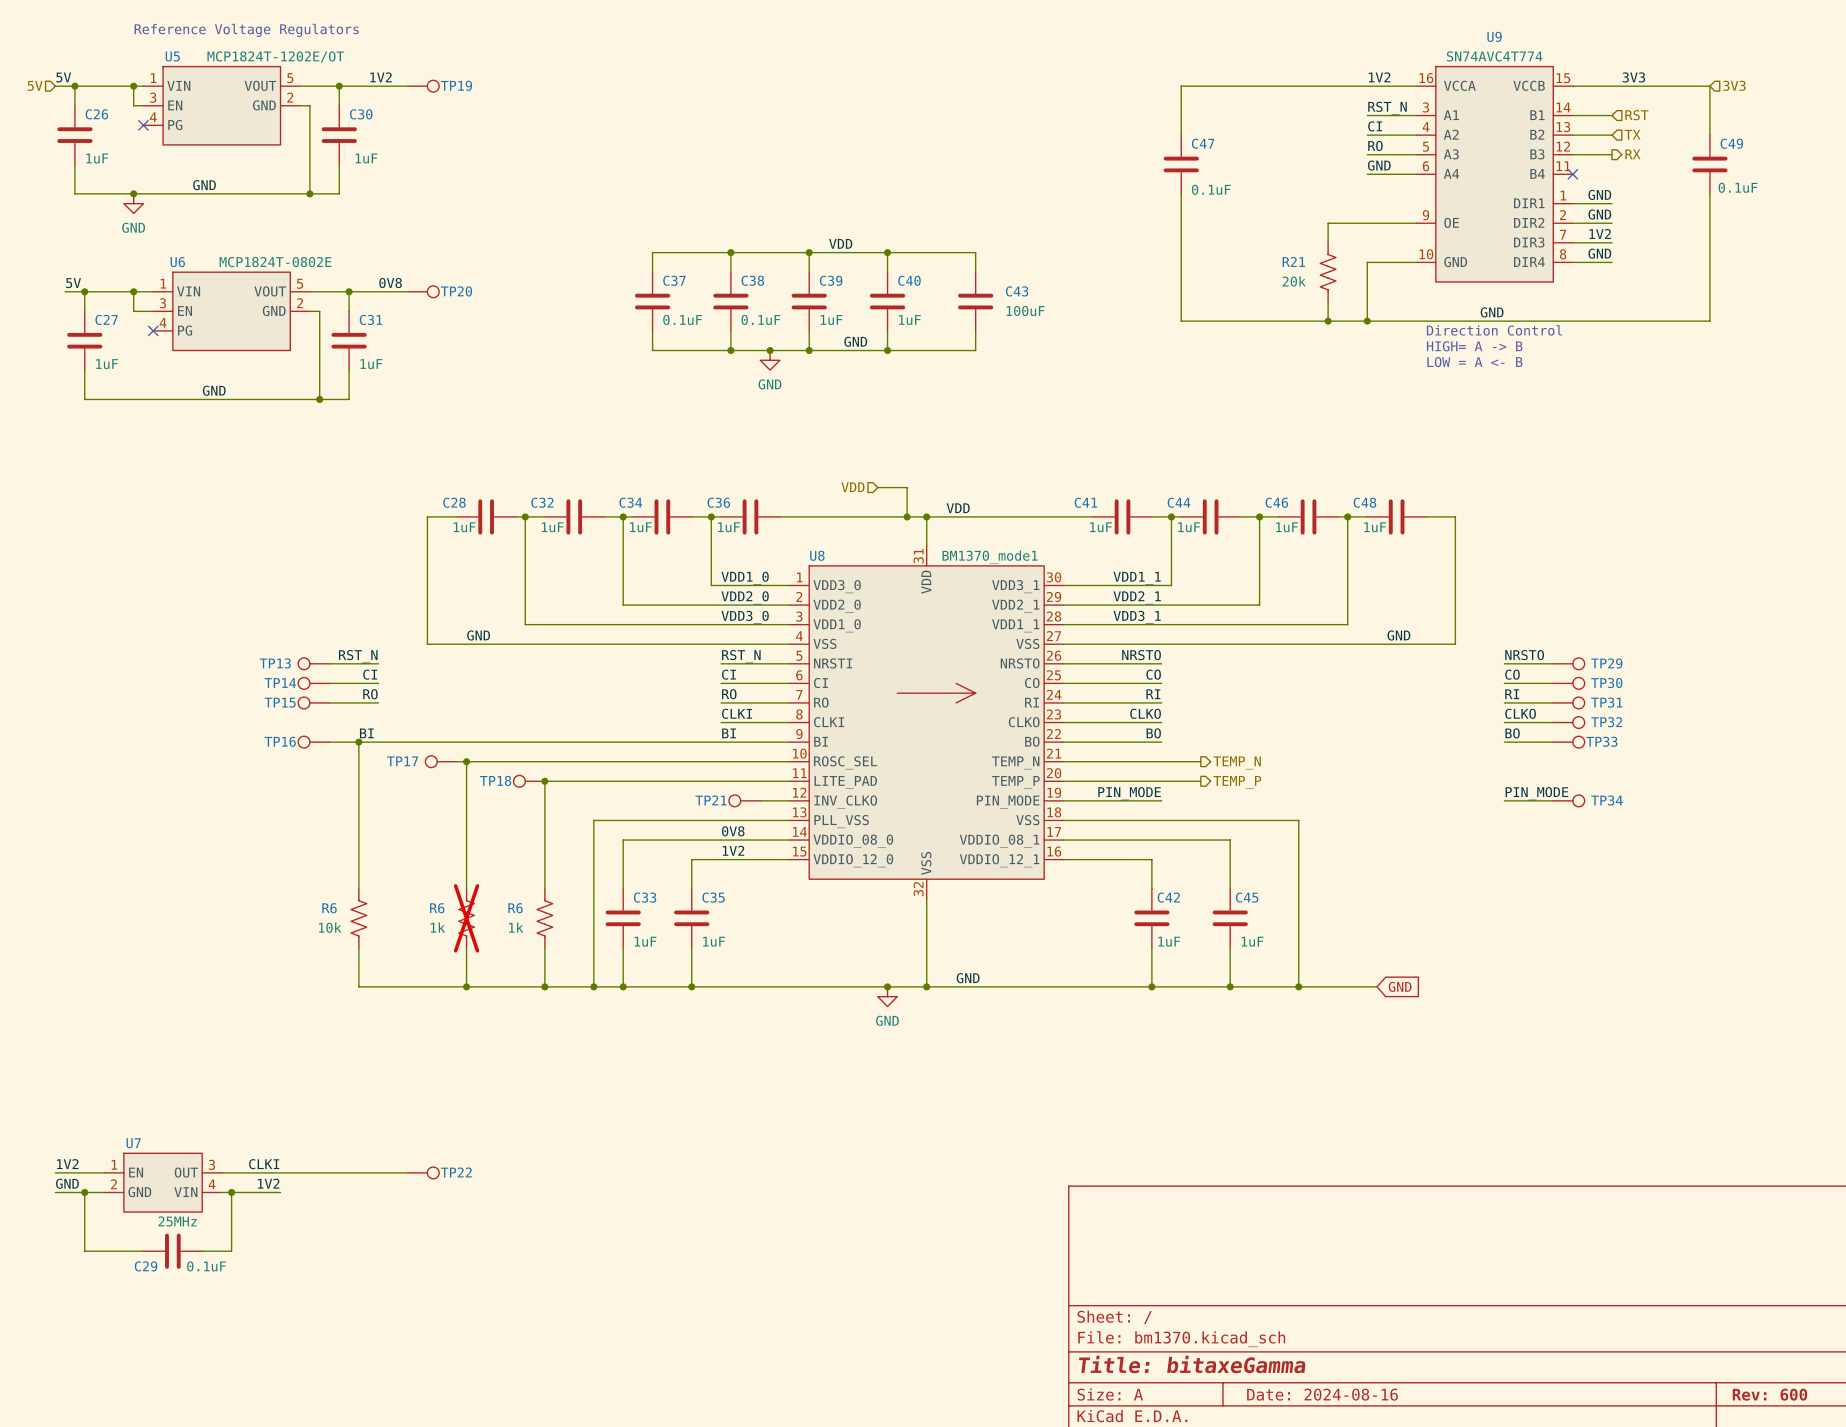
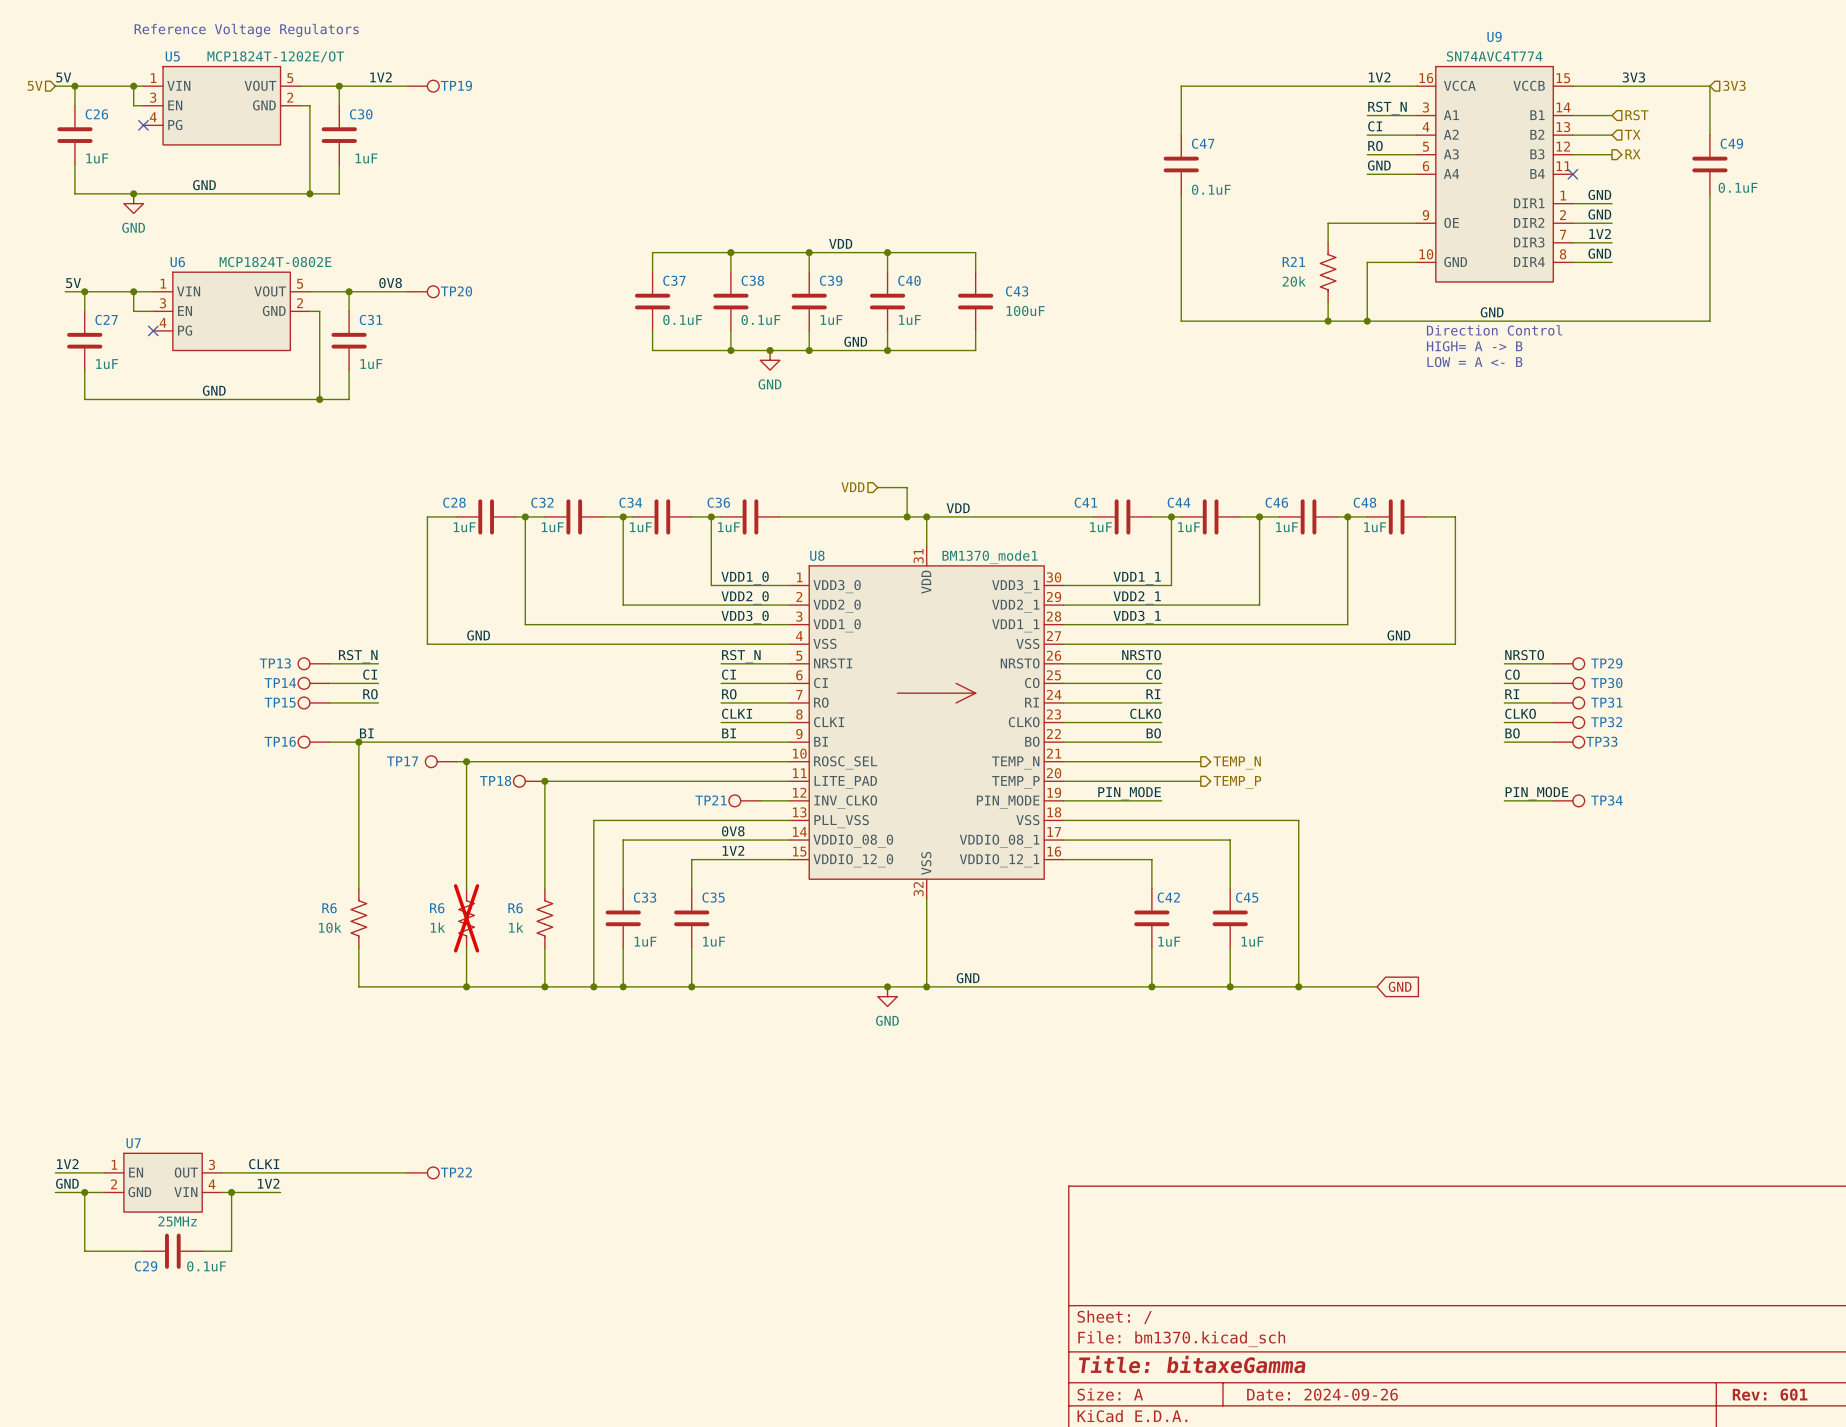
title block: Date: 2024-08-16 (1322, 1394) -> Date: 2024-09-26 (1322, 1394)
title block: Rev: 600 (1769, 1394) -> Rev: 601 (1770, 1394)

